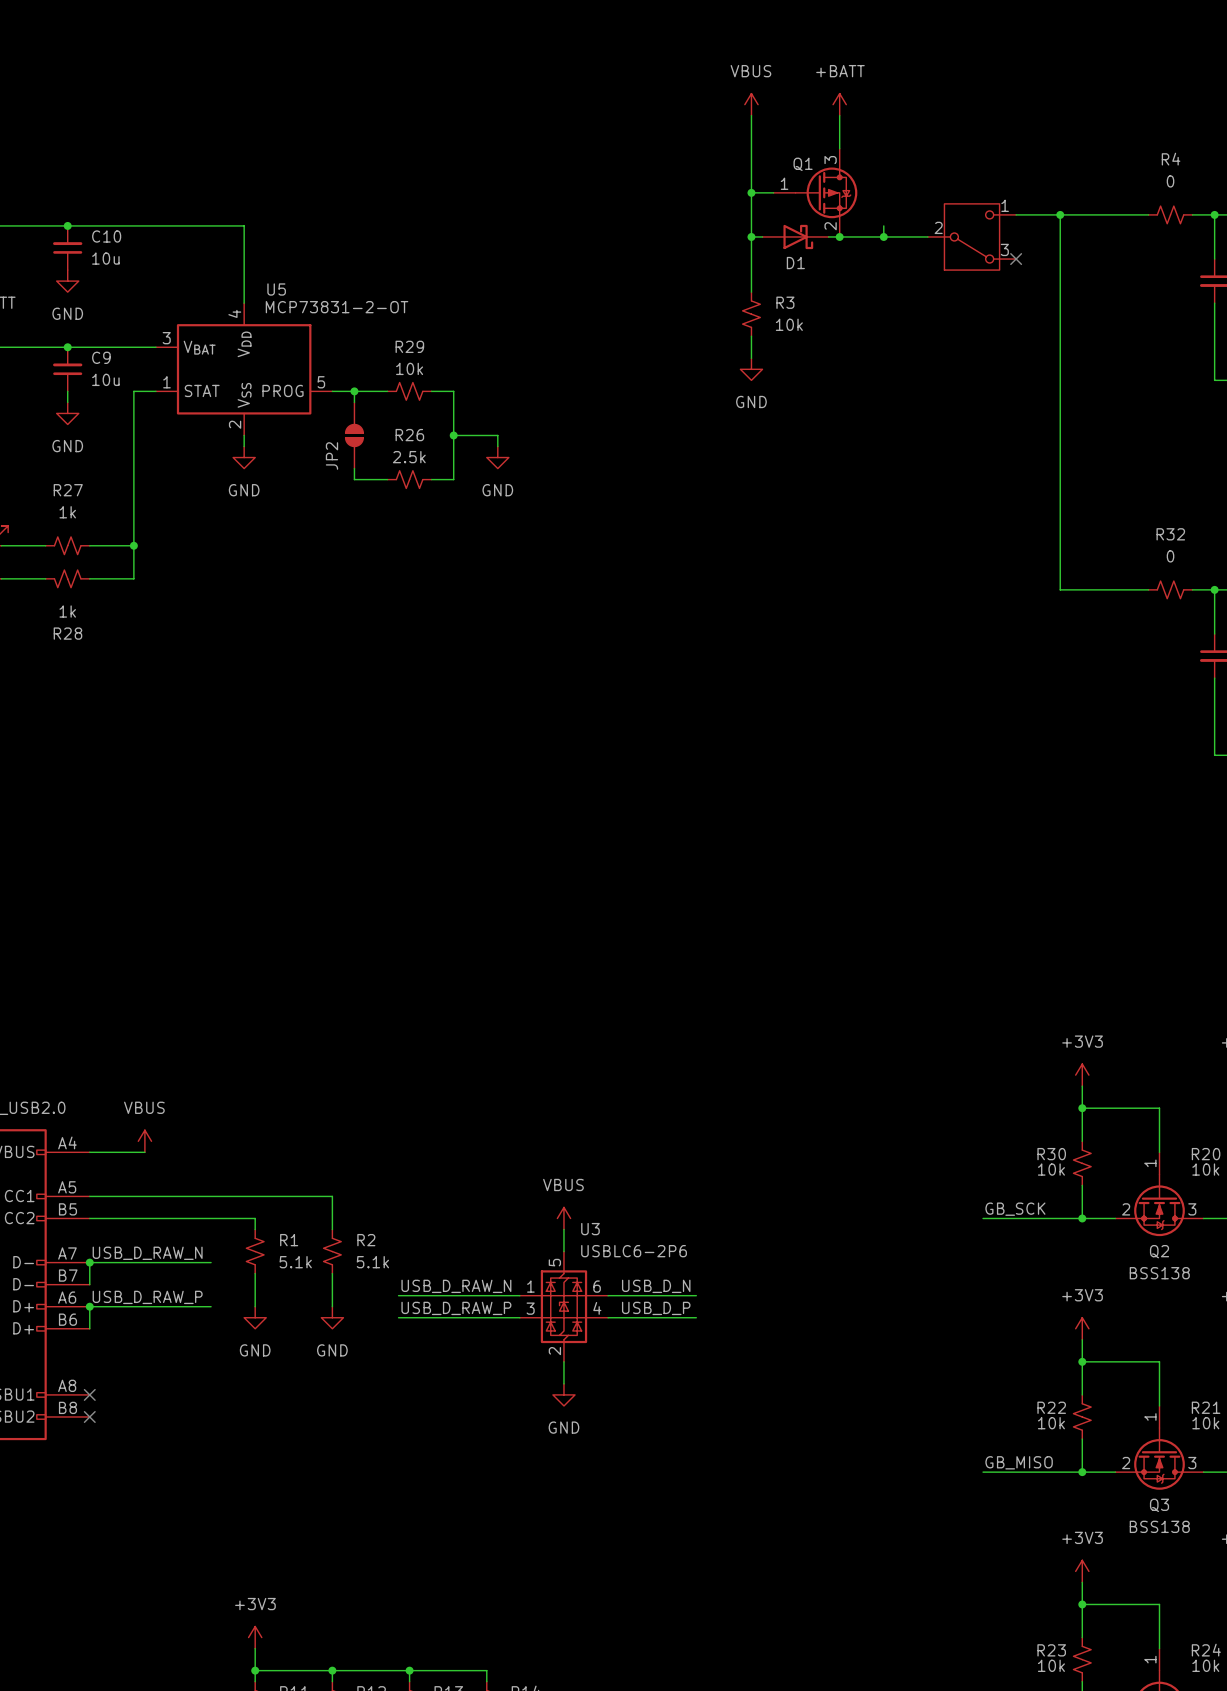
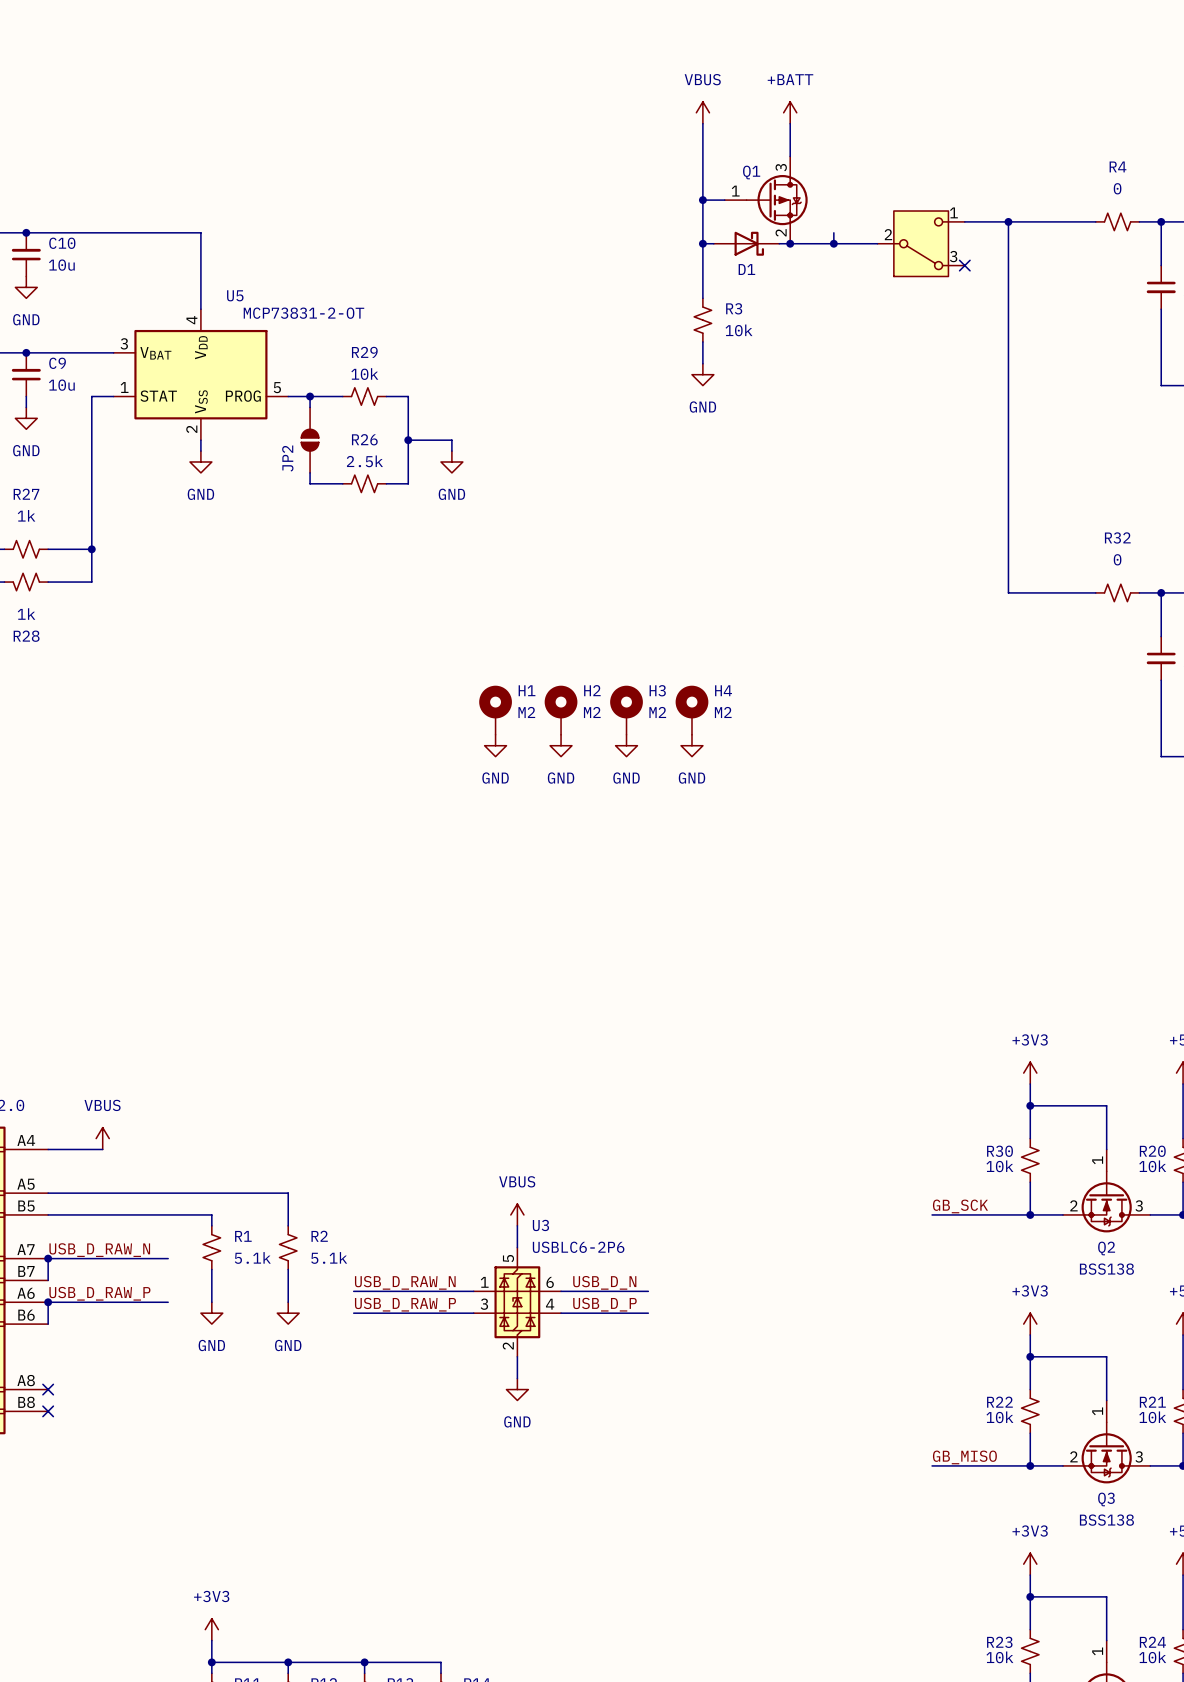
H1: none -> M2 (495, 710)
H2: none -> M2 (561, 710)
H3: none -> M2 (626, 710)
H4: none -> M2 (691, 710)
power symbol: none -> GND (495, 745)
power symbol: none -> GND (561, 745)
power symbol: none -> GND (626, 745)
power symbol: none -> GND (691, 745)

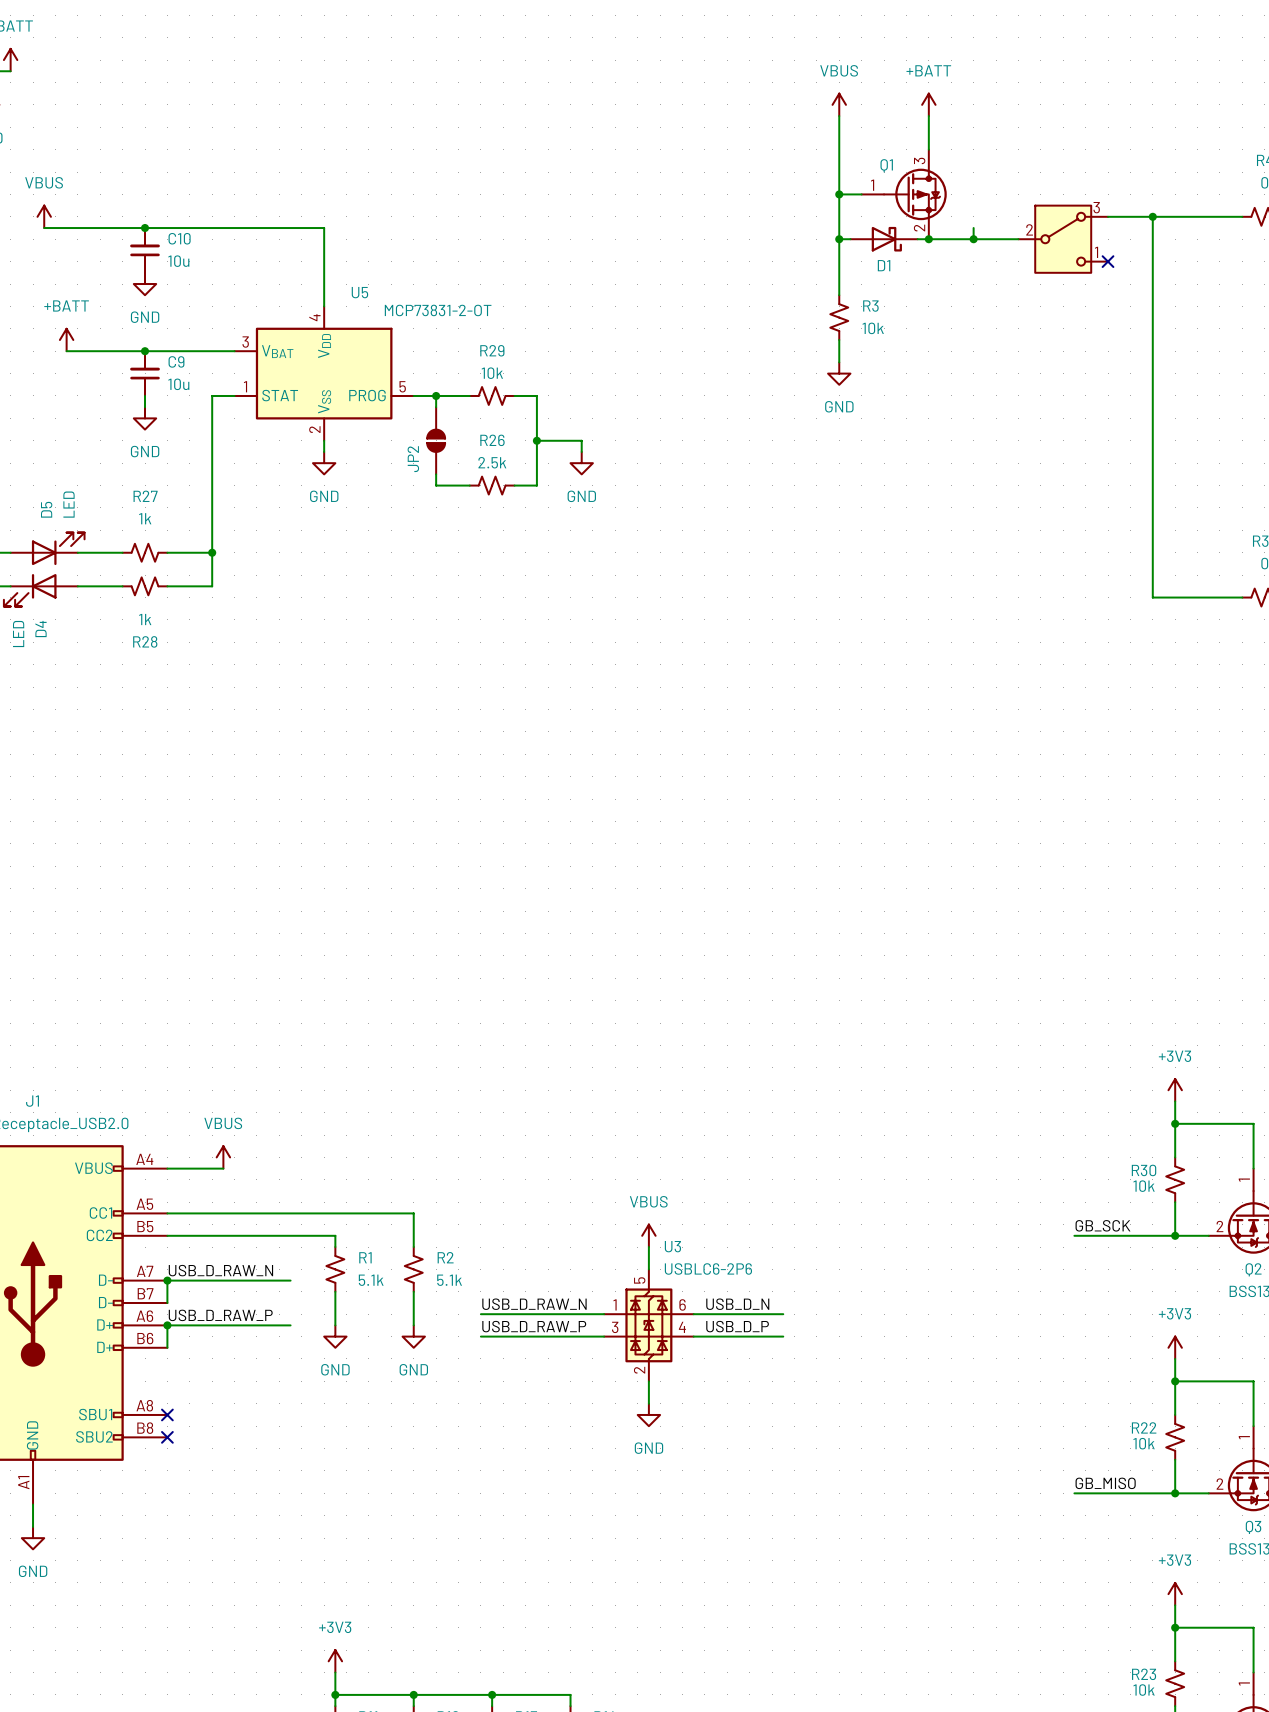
part flip: as is (921, 243) -> up-down (1063, 239)
H1: M2 (495, 710) -> none
H2: M2 (561, 710) -> none
H3: M2 (626, 710) -> none
H4: M2 (691, 710) -> none
power symbol: GND (495, 745) -> none
power symbol: GND (561, 745) -> none
power symbol: GND (626, 745) -> none
power symbol: GND (691, 745) -> none

